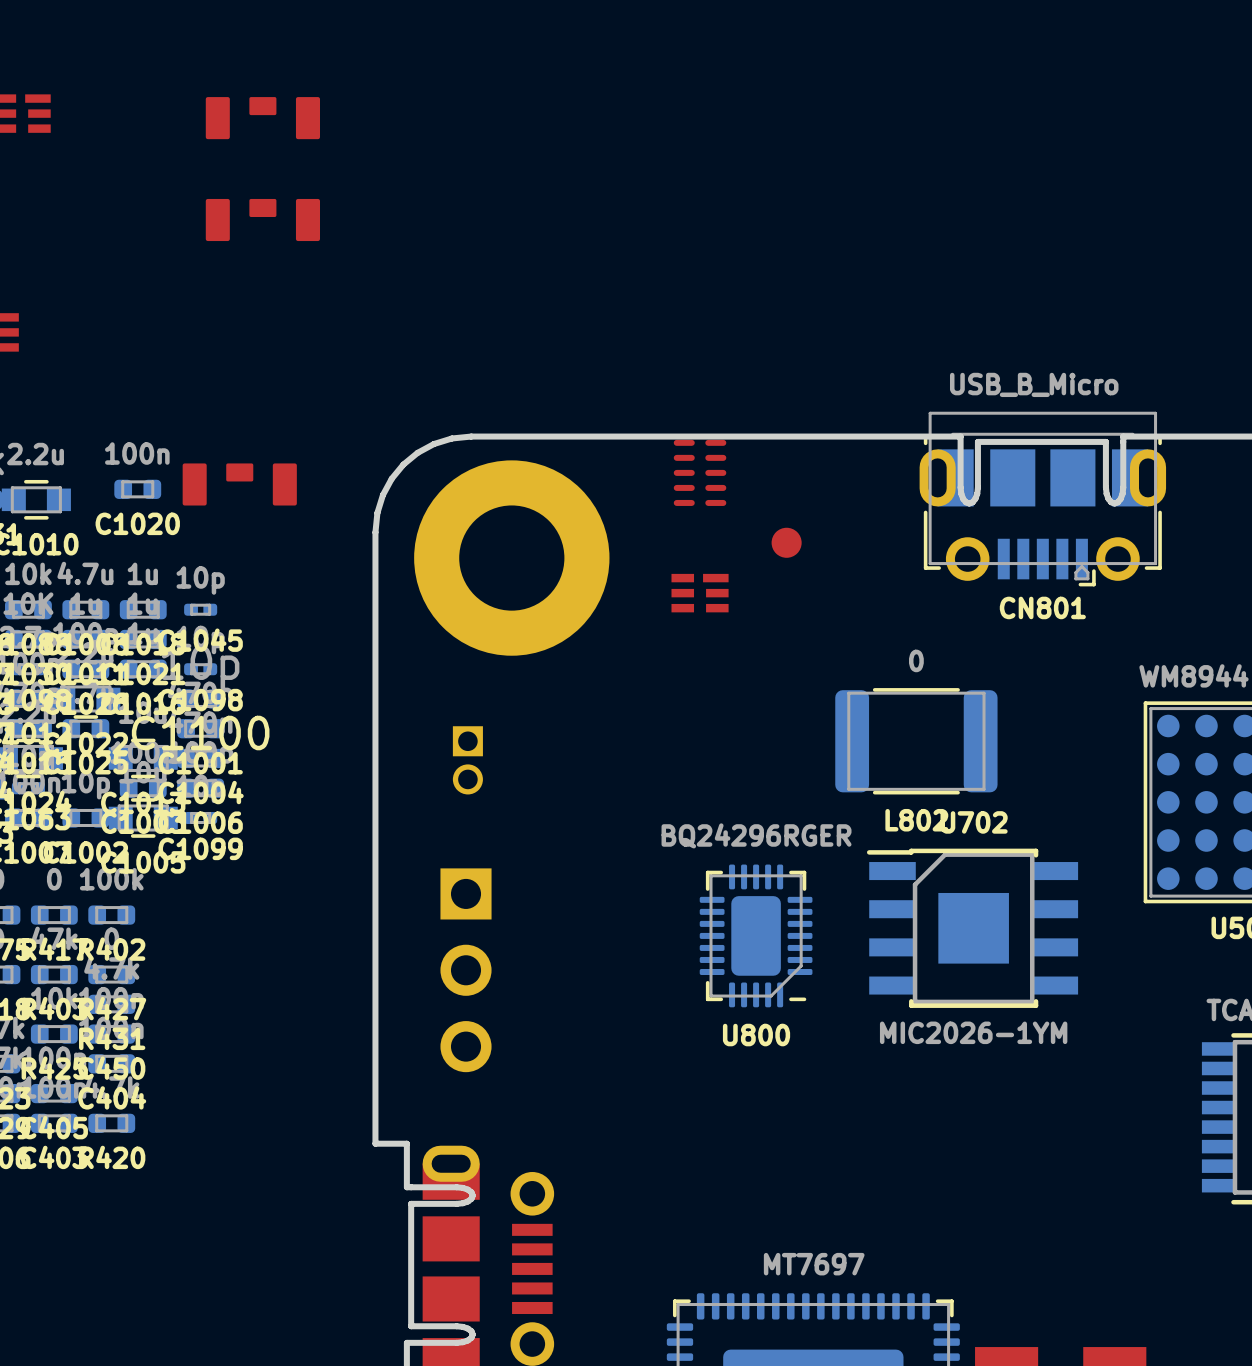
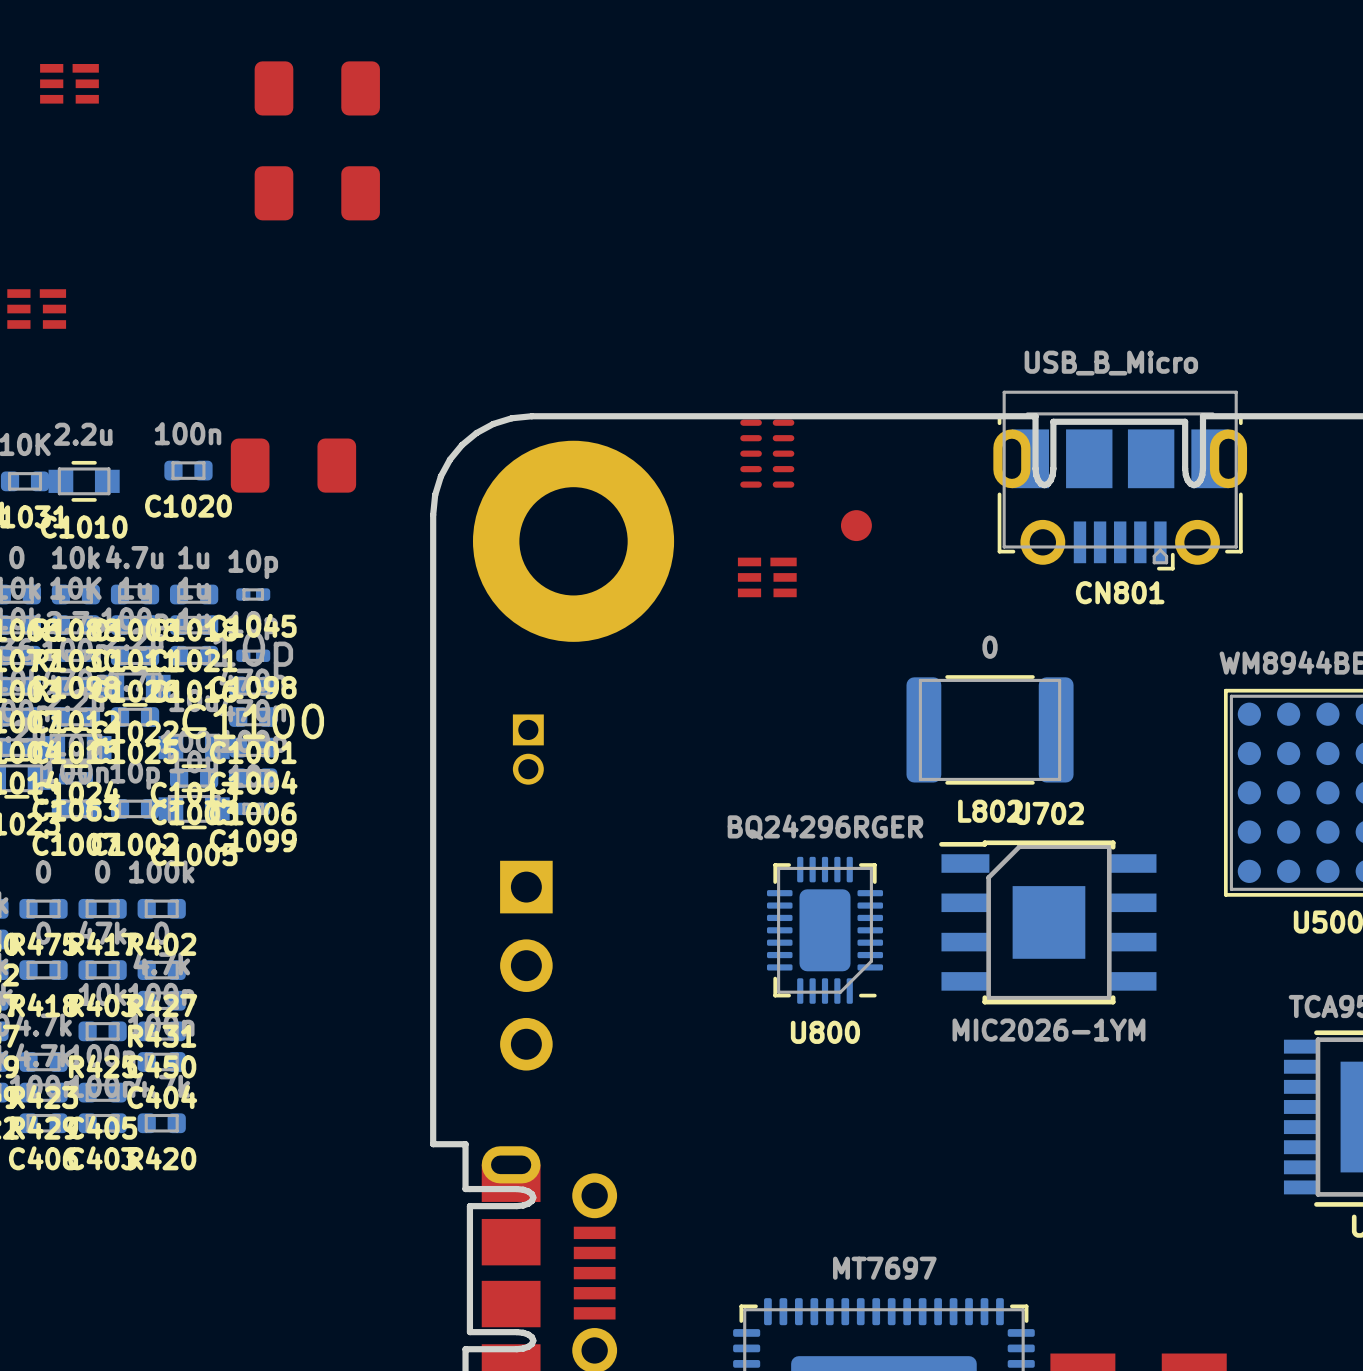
part footprint: [205, 97, 321, 140] -> [254, 61, 380, 116]
part footprint: [205, 198, 321, 242] -> [254, 166, 380, 221]
part footprint: [182, 463, 297, 506] -> [230, 438, 357, 493]

